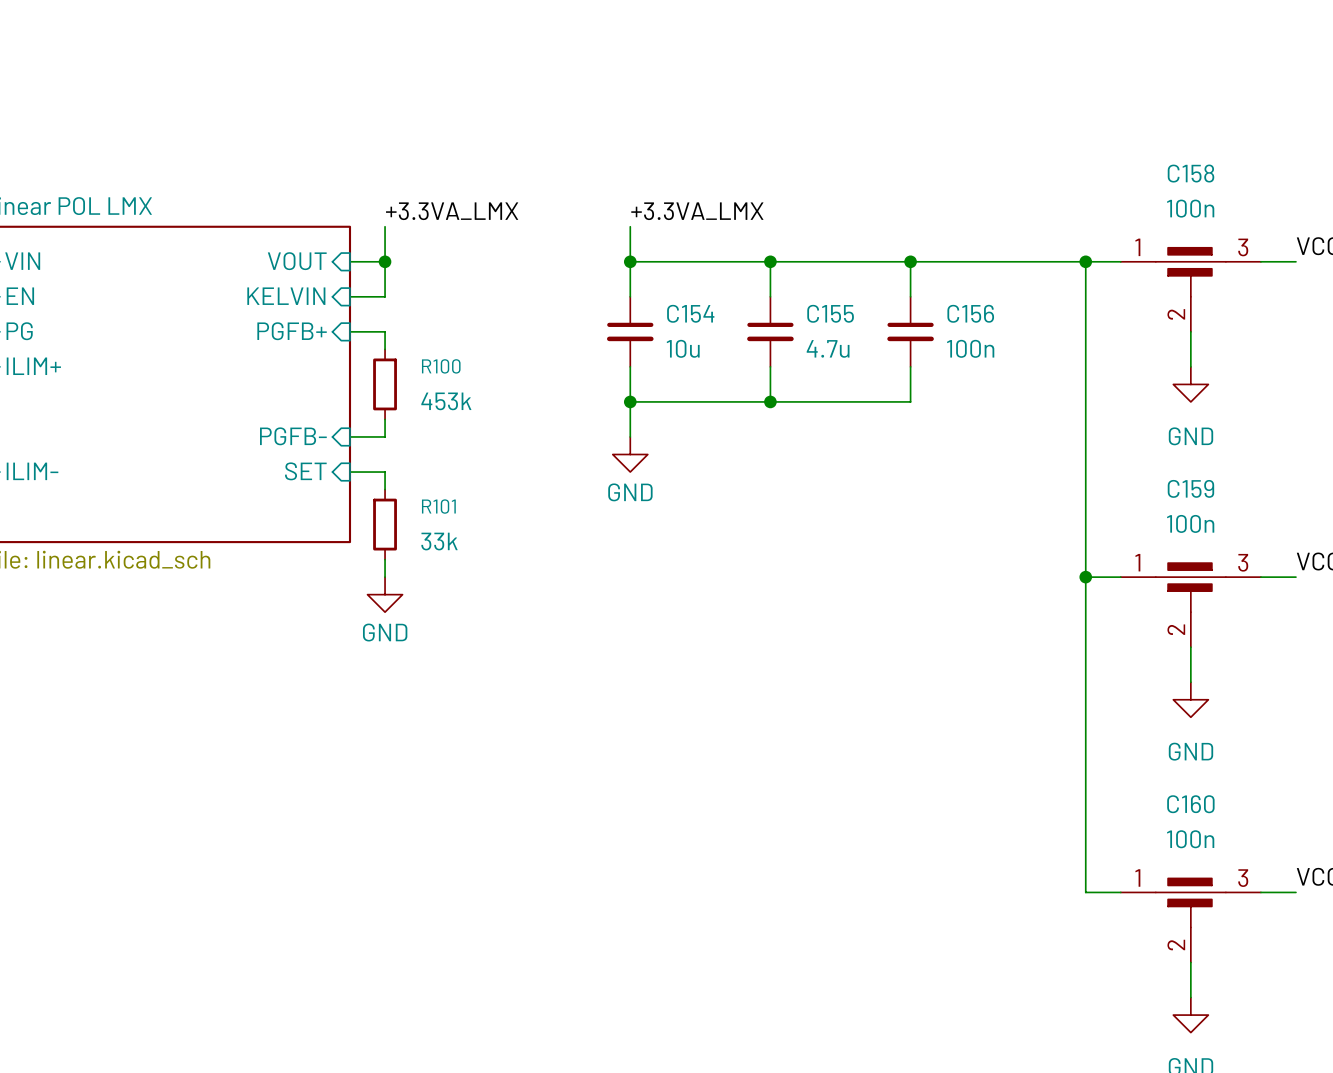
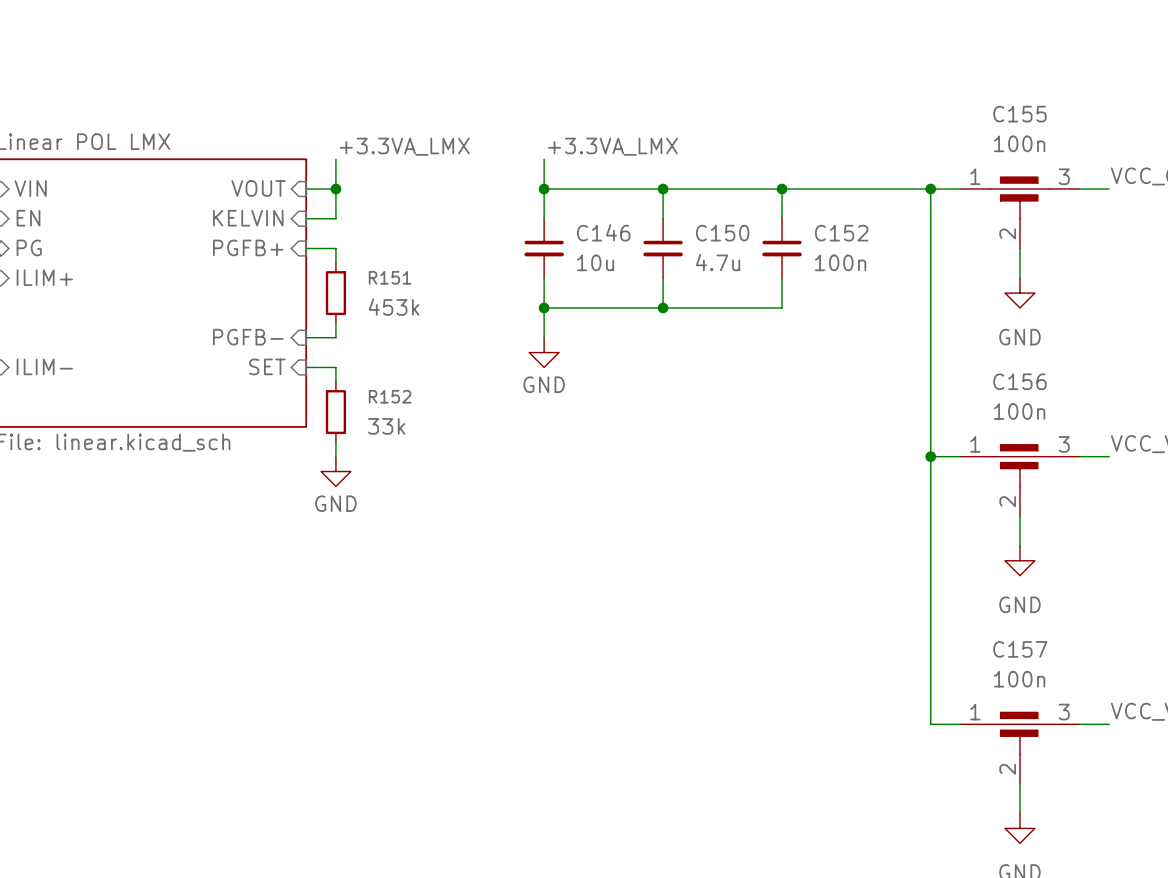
C158 name: C158 (1191, 173) -> C155 (1019, 114)
C154 name: C154 (690, 313) -> C146 (603, 232)
C155 name: C155 (830, 313) -> C150 (722, 233)
C156 name: C156 (970, 313) -> C152 (841, 233)
R100 name: R100 (441, 366) -> R151 (390, 277)
C159 name: C159 (1190, 488) -> C156 (1019, 381)
R101 name: R101 (438, 506) -> R152 (390, 396)
C160 name: C160 (1190, 804) -> C157 (1020, 649)

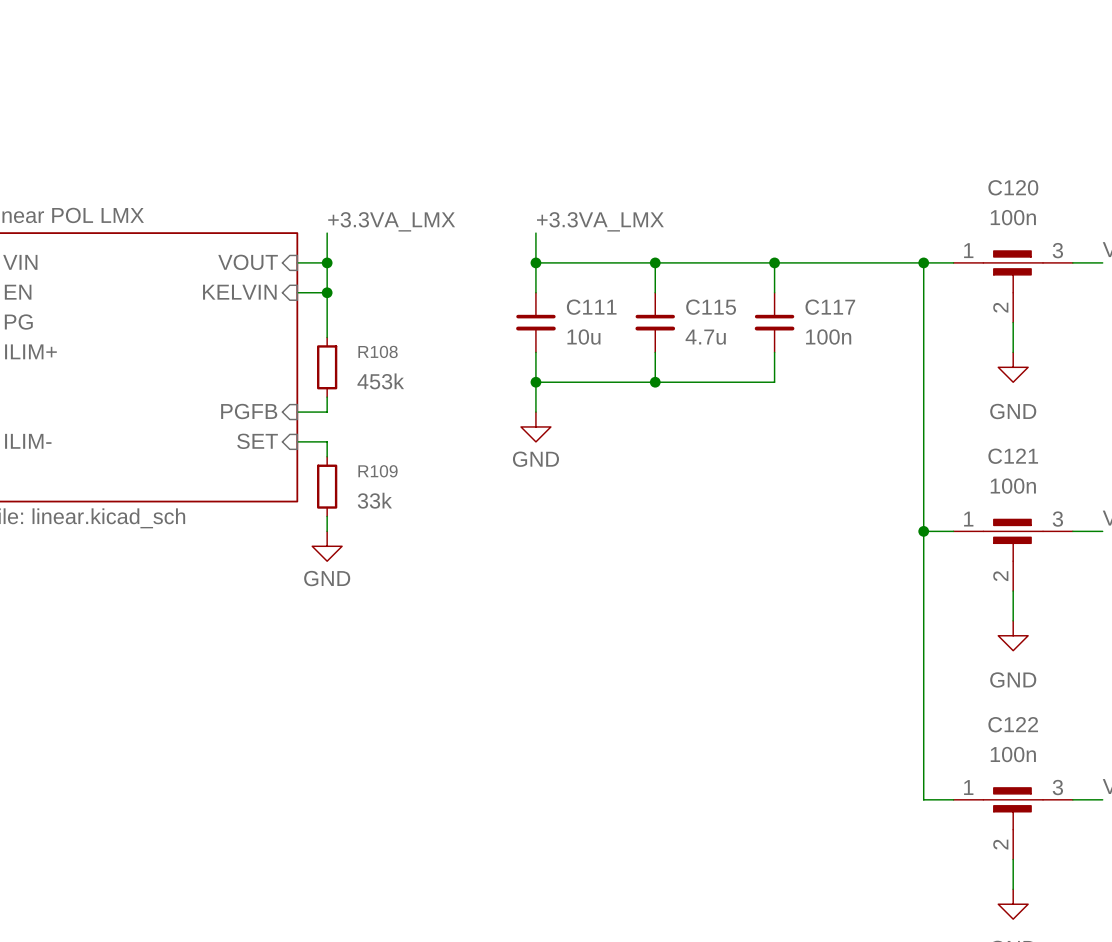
C155 name: C155 (1019, 114) -> C120 (1013, 187)
junction: none -> (327, 292)
C146 name: C146 (603, 232) -> C111 (591, 307)
C150 name: C150 (722, 233) -> C115 (711, 307)
C152 name: C152 (841, 233) -> C117 (830, 307)
sheet pin: PGFB+ (248, 247) -> none
wire: (306, 248) (335, 248) -> (327, 292) (327, 322)
R151 name: R151 (390, 277) -> R108 (378, 351)
sheet pin: PGFB- (248, 337) -> PGFB (249, 411)
C156 name: C156 (1019, 381) -> C121 (1013, 456)
R152 name: R152 (390, 396) -> R109 (378, 471)
C157 name: C157 (1020, 649) -> C122 (1013, 724)

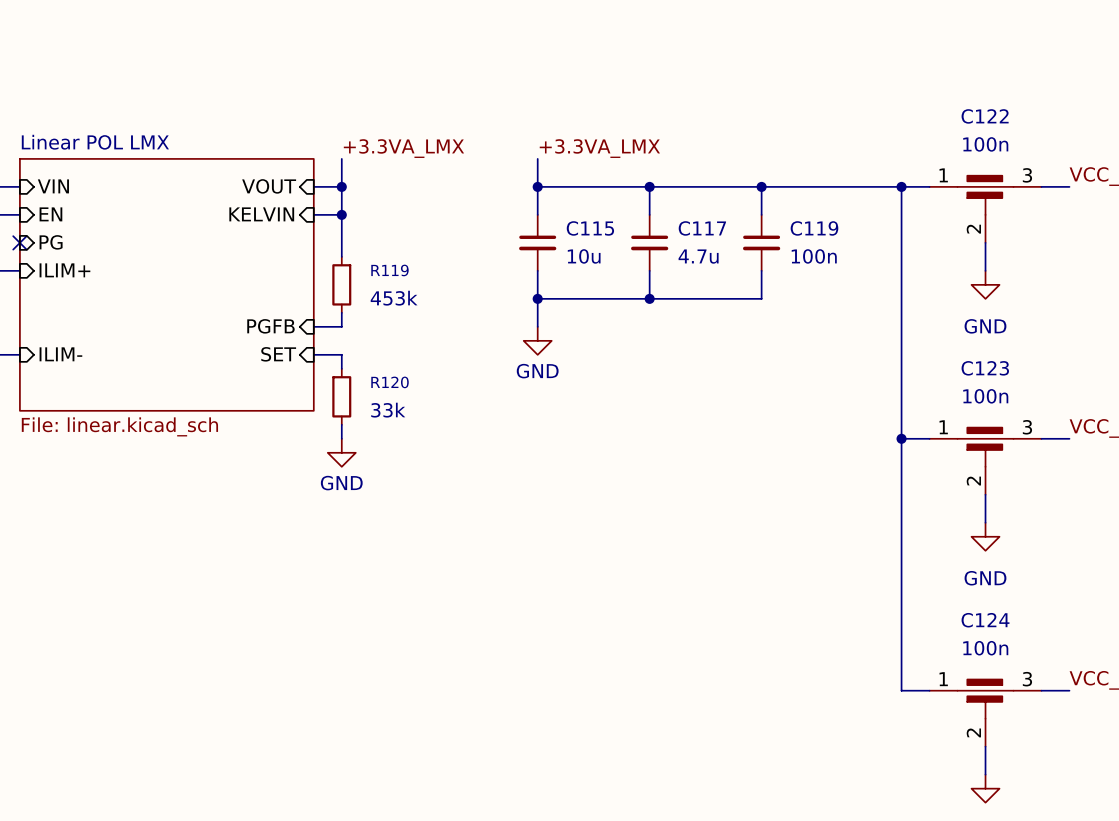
C120 name: C120 (1013, 187) -> C122 (985, 116)
C111 name: C111 (591, 307) -> C115 (590, 228)
C115 name: C115 (711, 307) -> C117 (702, 228)
C117 name: C117 (830, 307) -> C119 (814, 228)
R108 name: R108 (378, 351) -> R119 (389, 270)
C121 name: C121 (1013, 456) -> C123 (985, 368)
R109 name: R109 (378, 471) -> R120 (390, 382)
C122 name: C122 (1013, 724) -> C124 (985, 620)

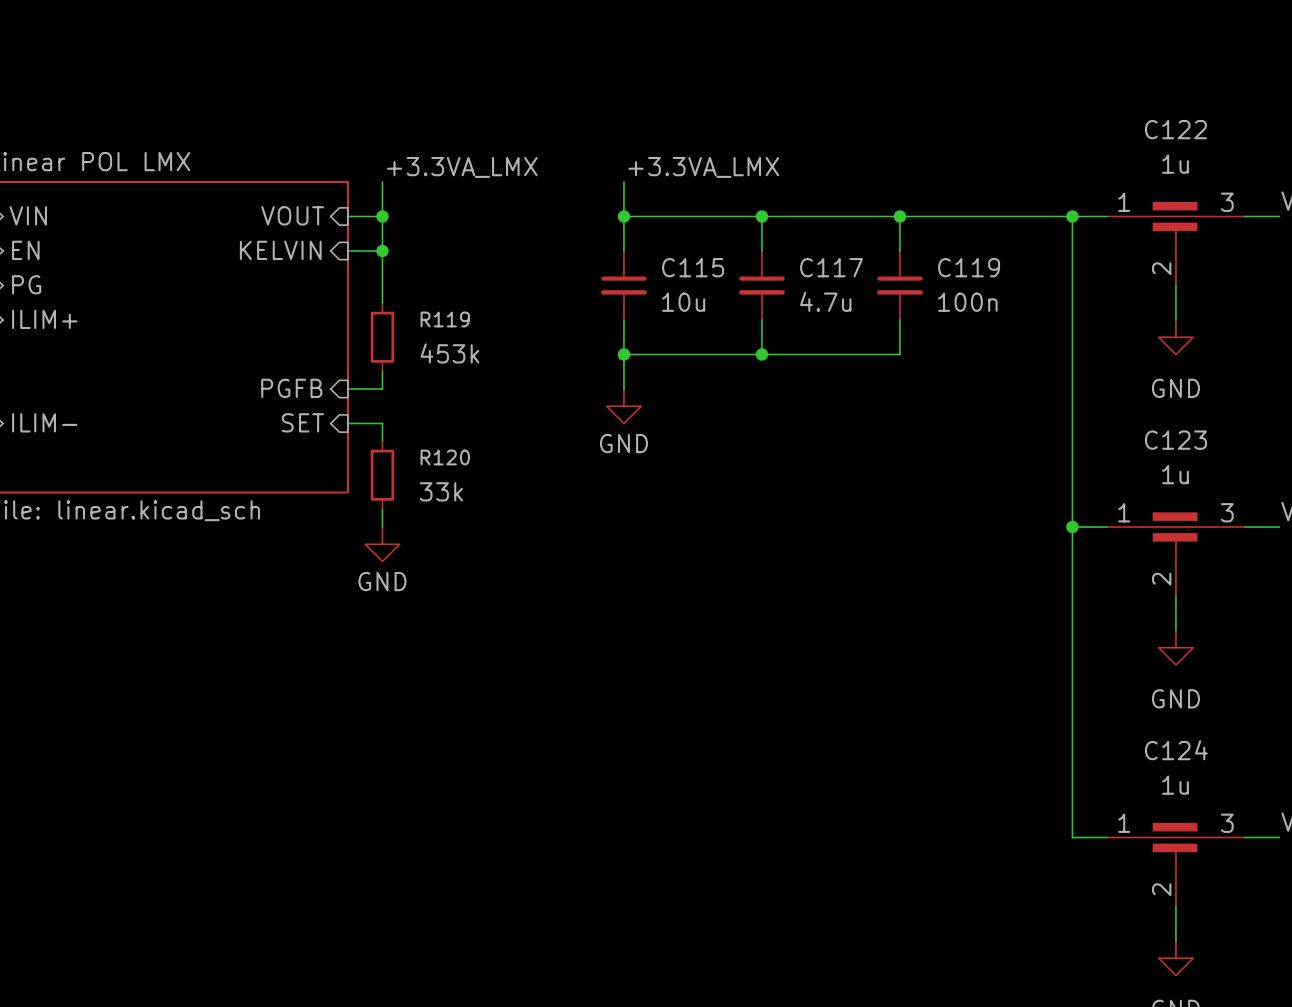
C122 value: 100n (985, 144) -> 1u (1175, 164)
C123 value: 100n (985, 396) -> 1u (1175, 474)
C124 value: 100n (985, 648) -> 1u (1175, 785)

